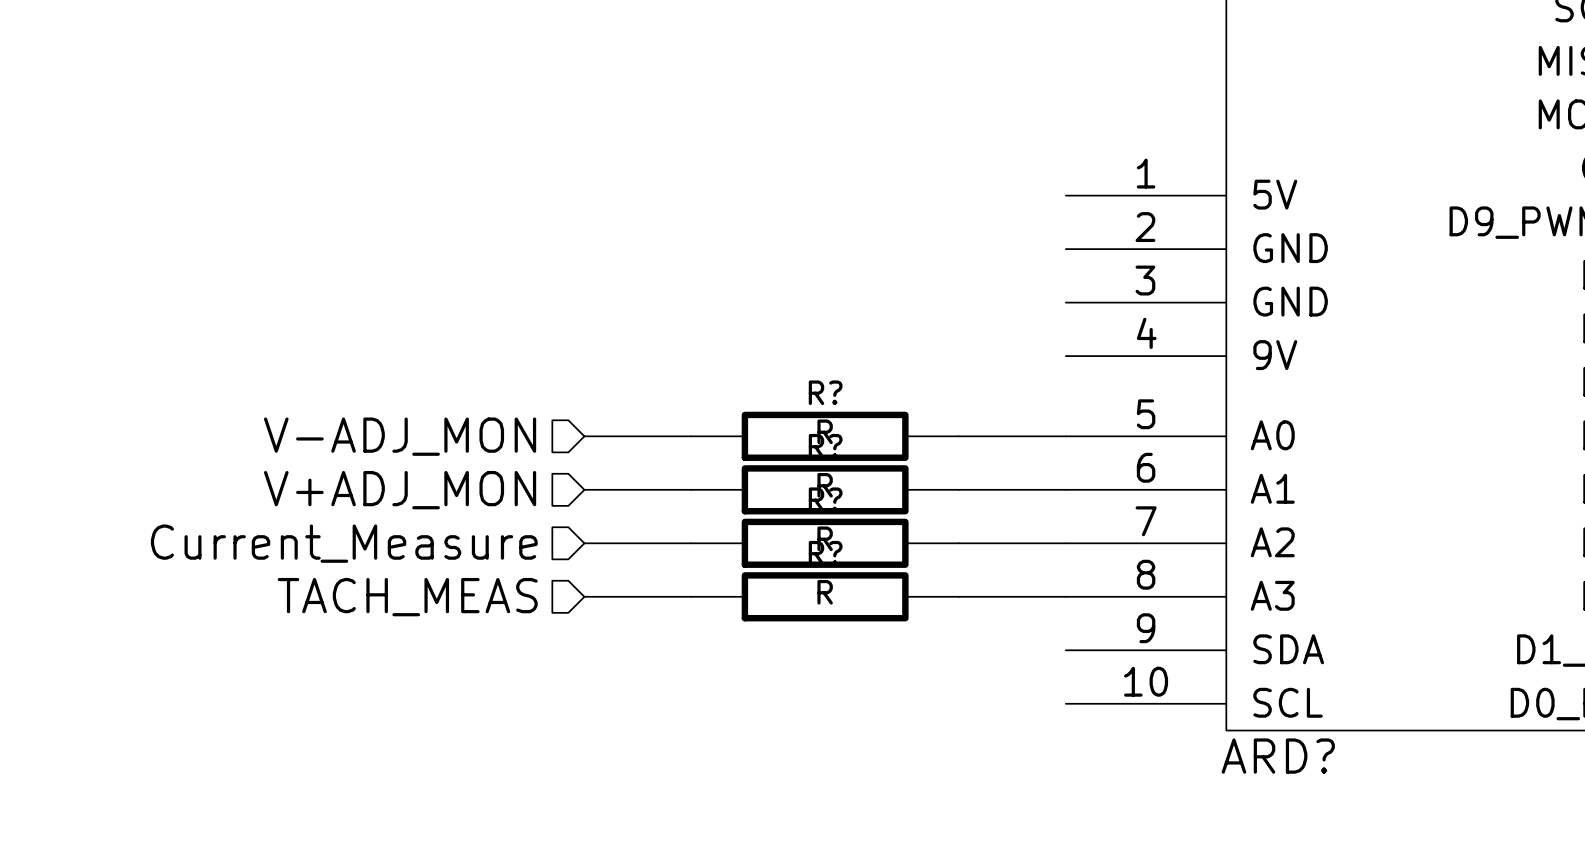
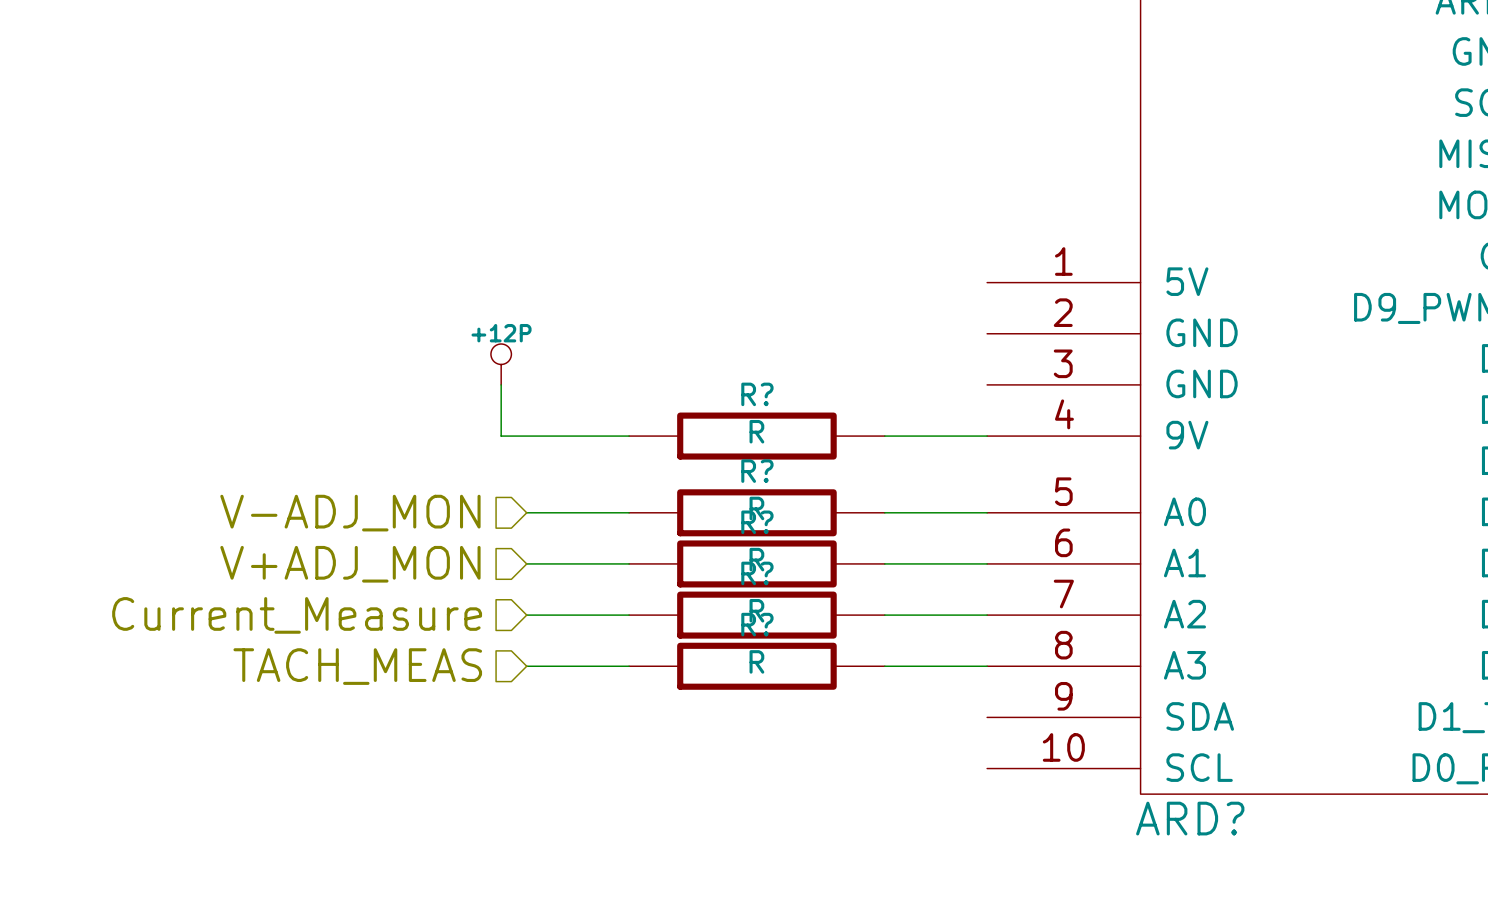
power symbol: none -> +12P (501, 364)
wire: none -> (501, 384) (501, 436) (629, 436)
R?: none -> R (756, 436)
wire: none -> (884, 436) (987, 436)

